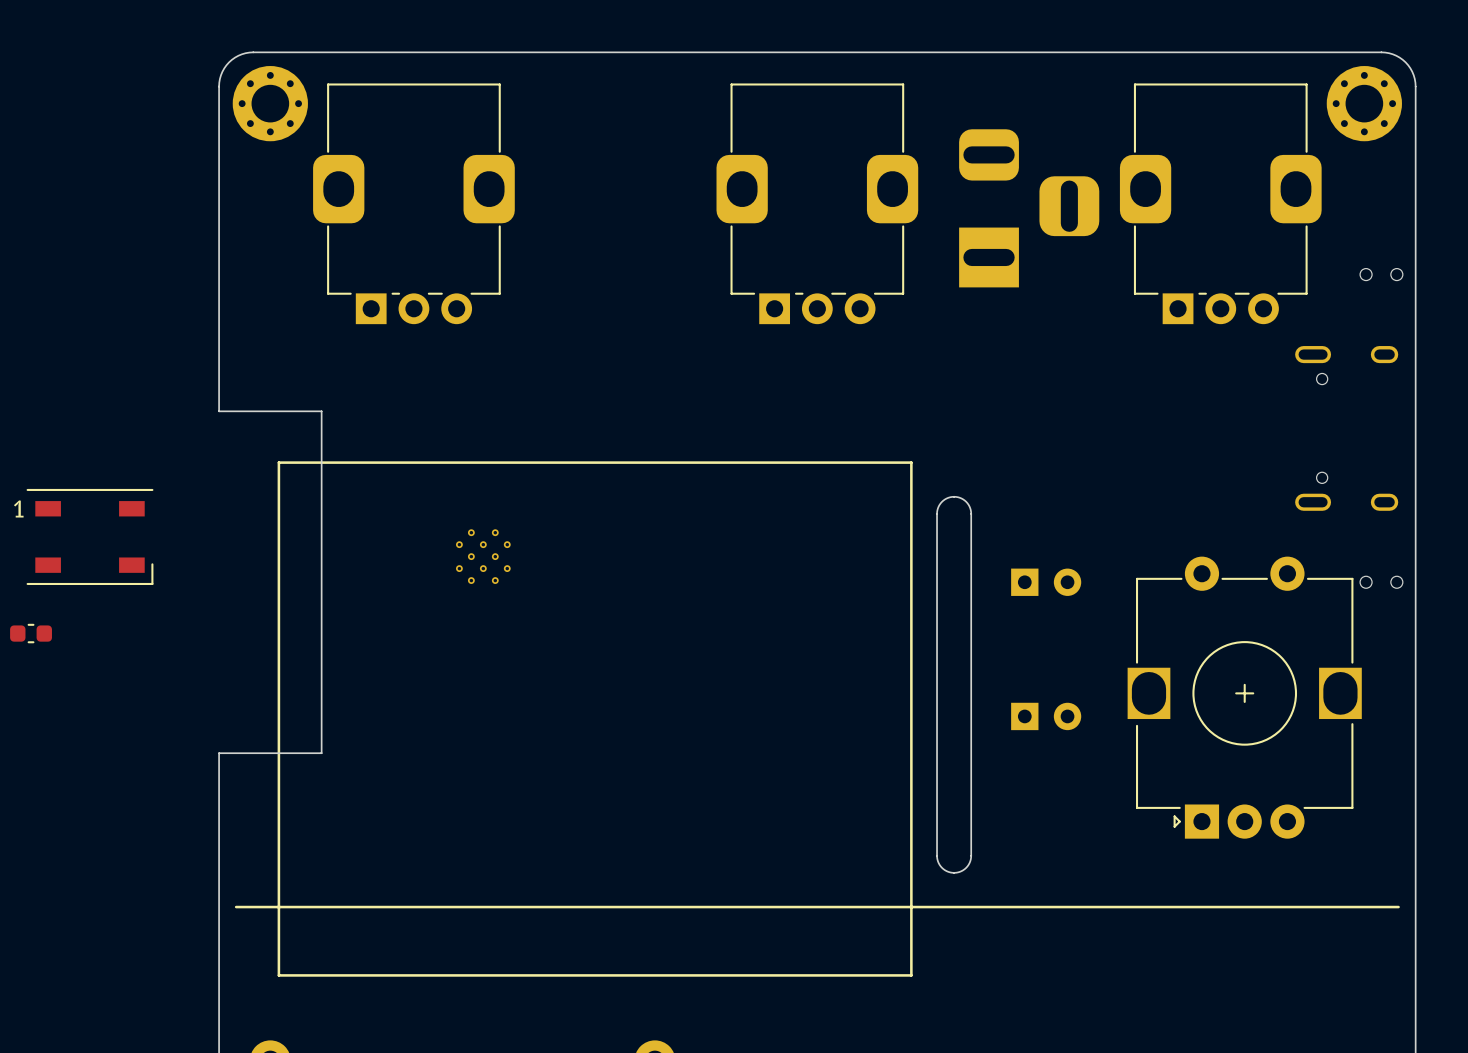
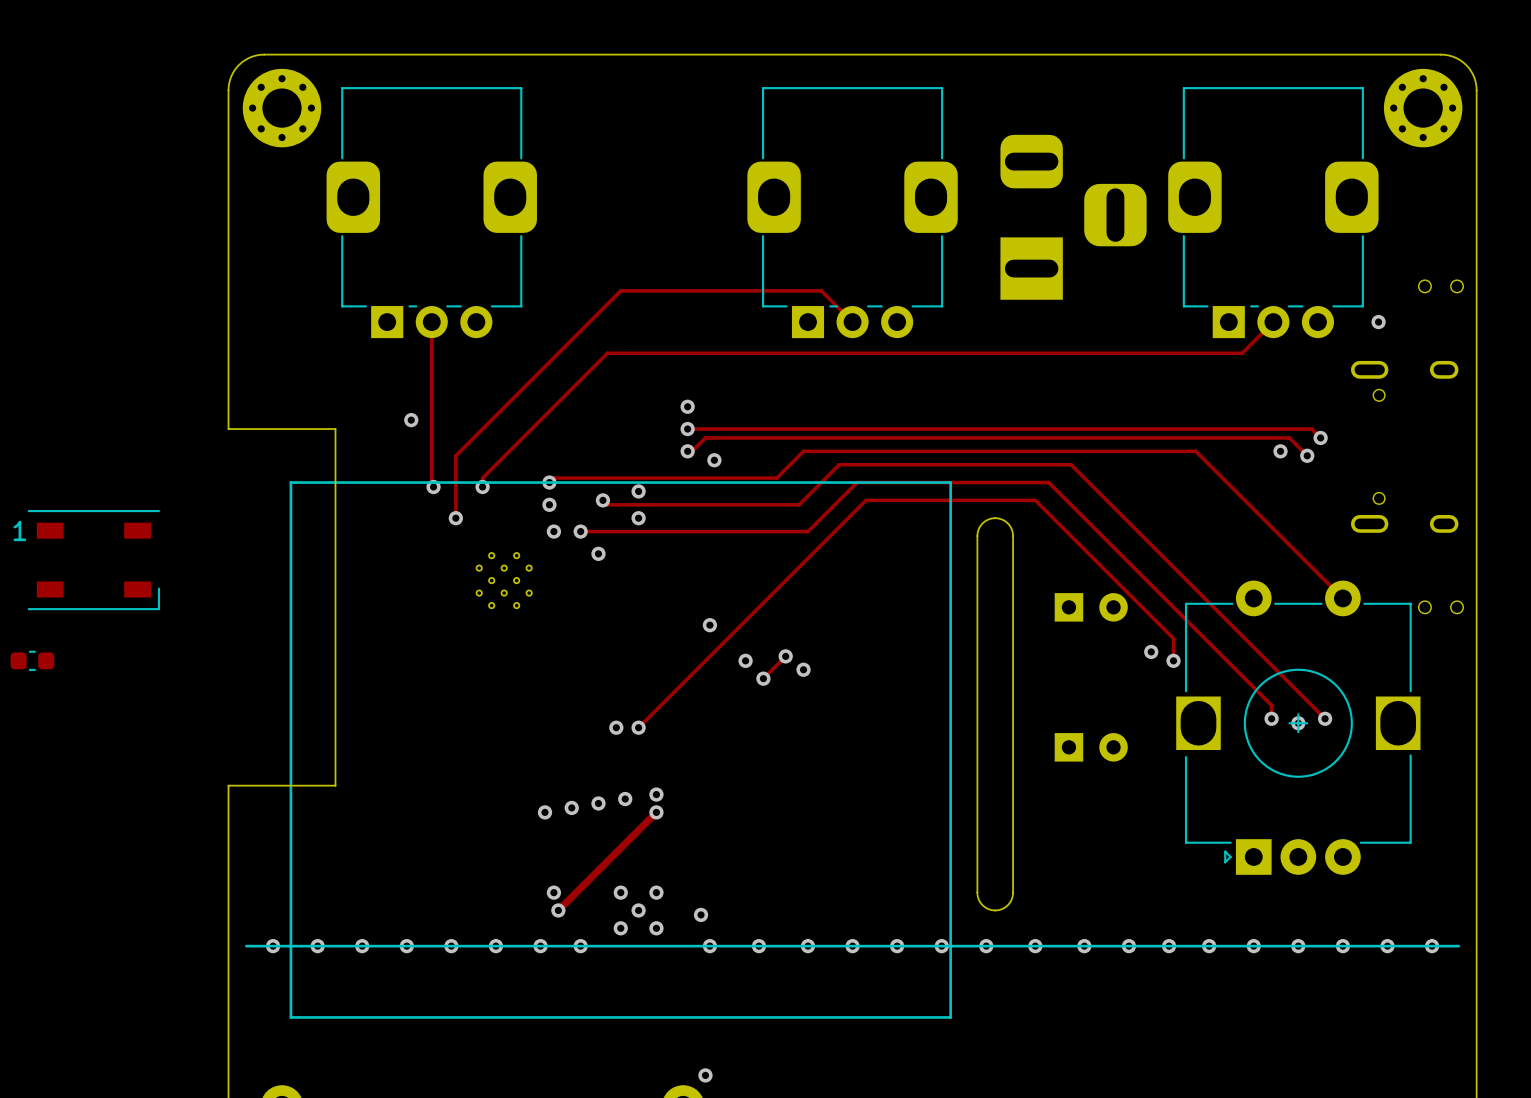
track: none -> (431, 322) (431, 485) (433, 486)
track: none -> (852, 322) (821, 290) (620, 290) (455, 455) (455, 518)
track: none -> (1273, 322) (1242, 353) (607, 353) (482, 478) (482, 486)
via: none -> (1378, 322)
via: none -> (687, 406)
via: none -> (411, 420)
track: none -> (687, 429) (1311, 429) (1320, 437)
via: none -> (687, 429)
via: none -> (1320, 437)
track: none -> (687, 451) (692, 451) (705, 437) (1289, 437) (1307, 455)
via: none -> (687, 451)
via: none -> (1280, 451)
via: none -> (1307, 455)
via: none -> (714, 460)
track: none -> (549, 482) (553, 478) (776, 478) (803, 451) (1195, 451) (1342, 598)
via: none -> (549, 482)
via: none -> (433, 486)
via: none -> (482, 486)
via: none -> (638, 491)
track: none -> (602, 500) (607, 504) (799, 504) (839, 464) (1071, 464) (1325, 718)
via: none -> (602, 500)
via: none -> (549, 504)
via: none -> (455, 518)
via: none -> (638, 518)
via: none -> (553, 531)
track: none -> (580, 531) (808, 531) (857, 482) (1048, 482) (1271, 705) (1271, 718)
via: none -> (580, 531)
via: none -> (598, 553)
via: none -> (709, 625)
via: none -> (1151, 651)
track: none -> (785, 656) (763, 678)
via: none -> (785, 656)
via: none -> (745, 660)
track: none -> (1173, 660) (1173, 638) (1035, 500) (865, 500) (638, 727)
via: none -> (1173, 660)
via: none -> (803, 669)
via: none -> (763, 678)
via: none -> (1271, 718)
via: none -> (1325, 718)
via: none -> (1298, 723)
via: none -> (616, 727)
via: none -> (638, 727)
via: none -> (656, 794)
via: none -> (625, 799)
via: none -> (598, 803)
via: none -> (571, 807)
via: none -> (545, 812)
track: none -> (656, 812) (558, 910)
via: none -> (656, 812)
via: none -> (553, 892)
via: none -> (620, 892)
via: none -> (656, 892)
via: none -> (558, 910)
via: none -> (638, 910)
via: none -> (701, 914)
via: none -> (620, 928)
via: none -> (656, 928)
via: none -> (273, 946)
via: none -> (317, 946)
via: none -> (362, 946)
via: none -> (406, 946)
via: none -> (451, 946)
via: none -> (495, 946)
via: none -> (540, 946)
via: none -> (580, 946)
via: none -> (709, 946)
via: none -> (758, 946)
via: none -> (808, 946)
via: none -> (852, 946)
via: none -> (897, 946)
via: none -> (941, 946)
via: none -> (986, 946)
via: none -> (1035, 946)
via: none -> (1084, 946)
via: none -> (1128, 946)
via: none -> (1169, 946)
via: none -> (1209, 946)
via: none -> (1253, 946)
via: none -> (1298, 946)
via: none -> (1342, 946)
via: none -> (1387, 946)
via: none -> (1432, 946)
via: none -> (705, 1075)

